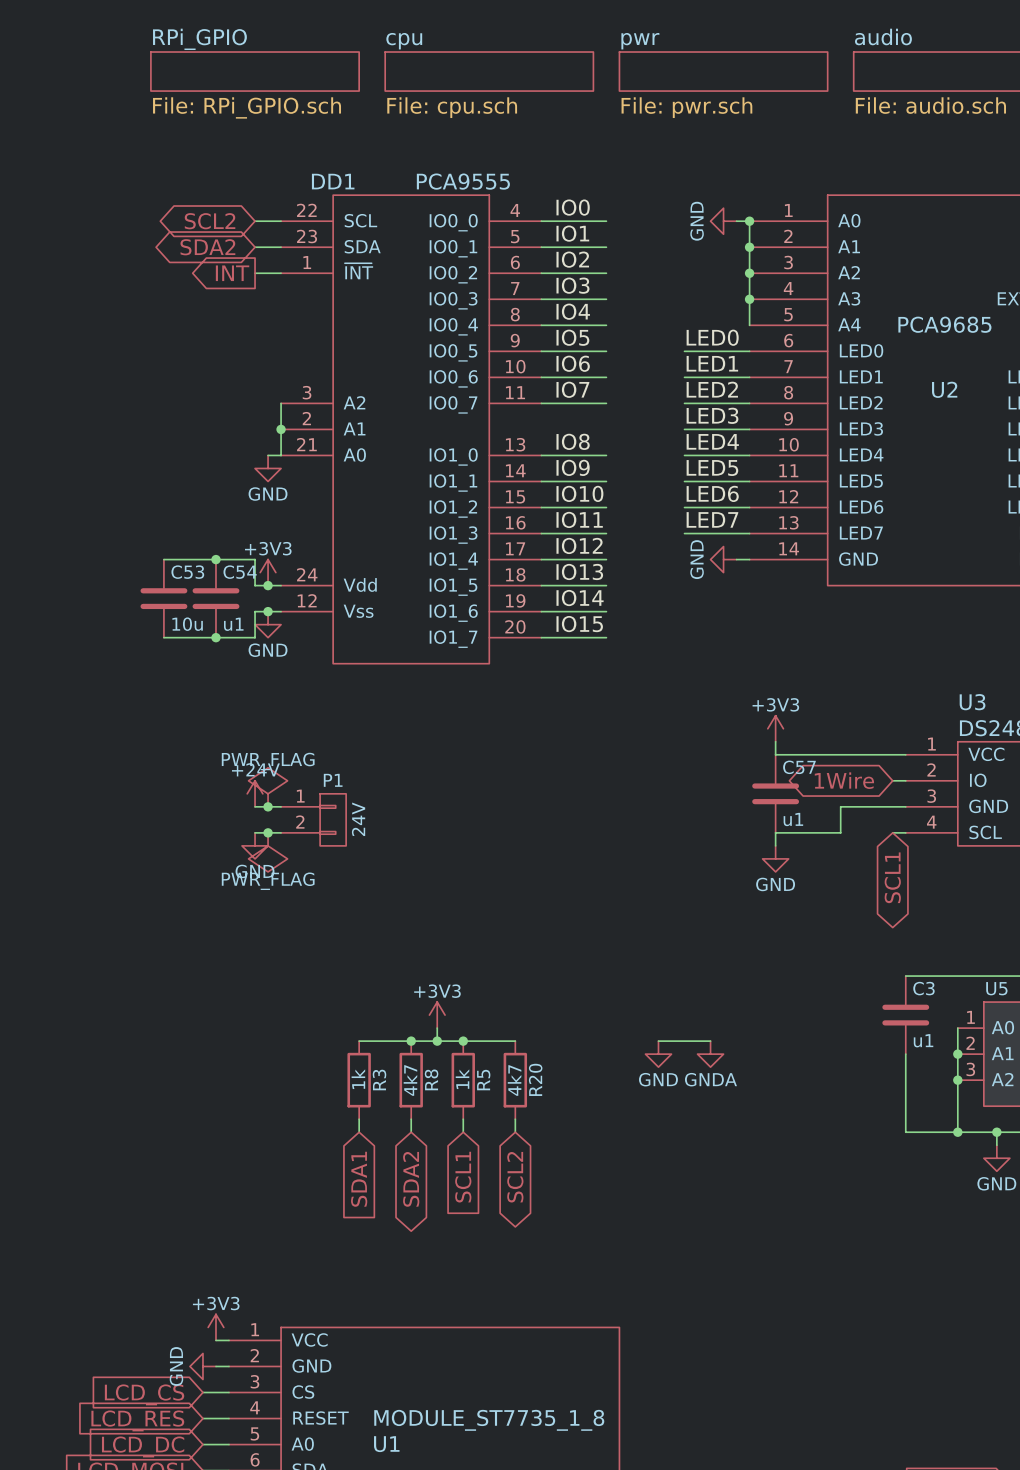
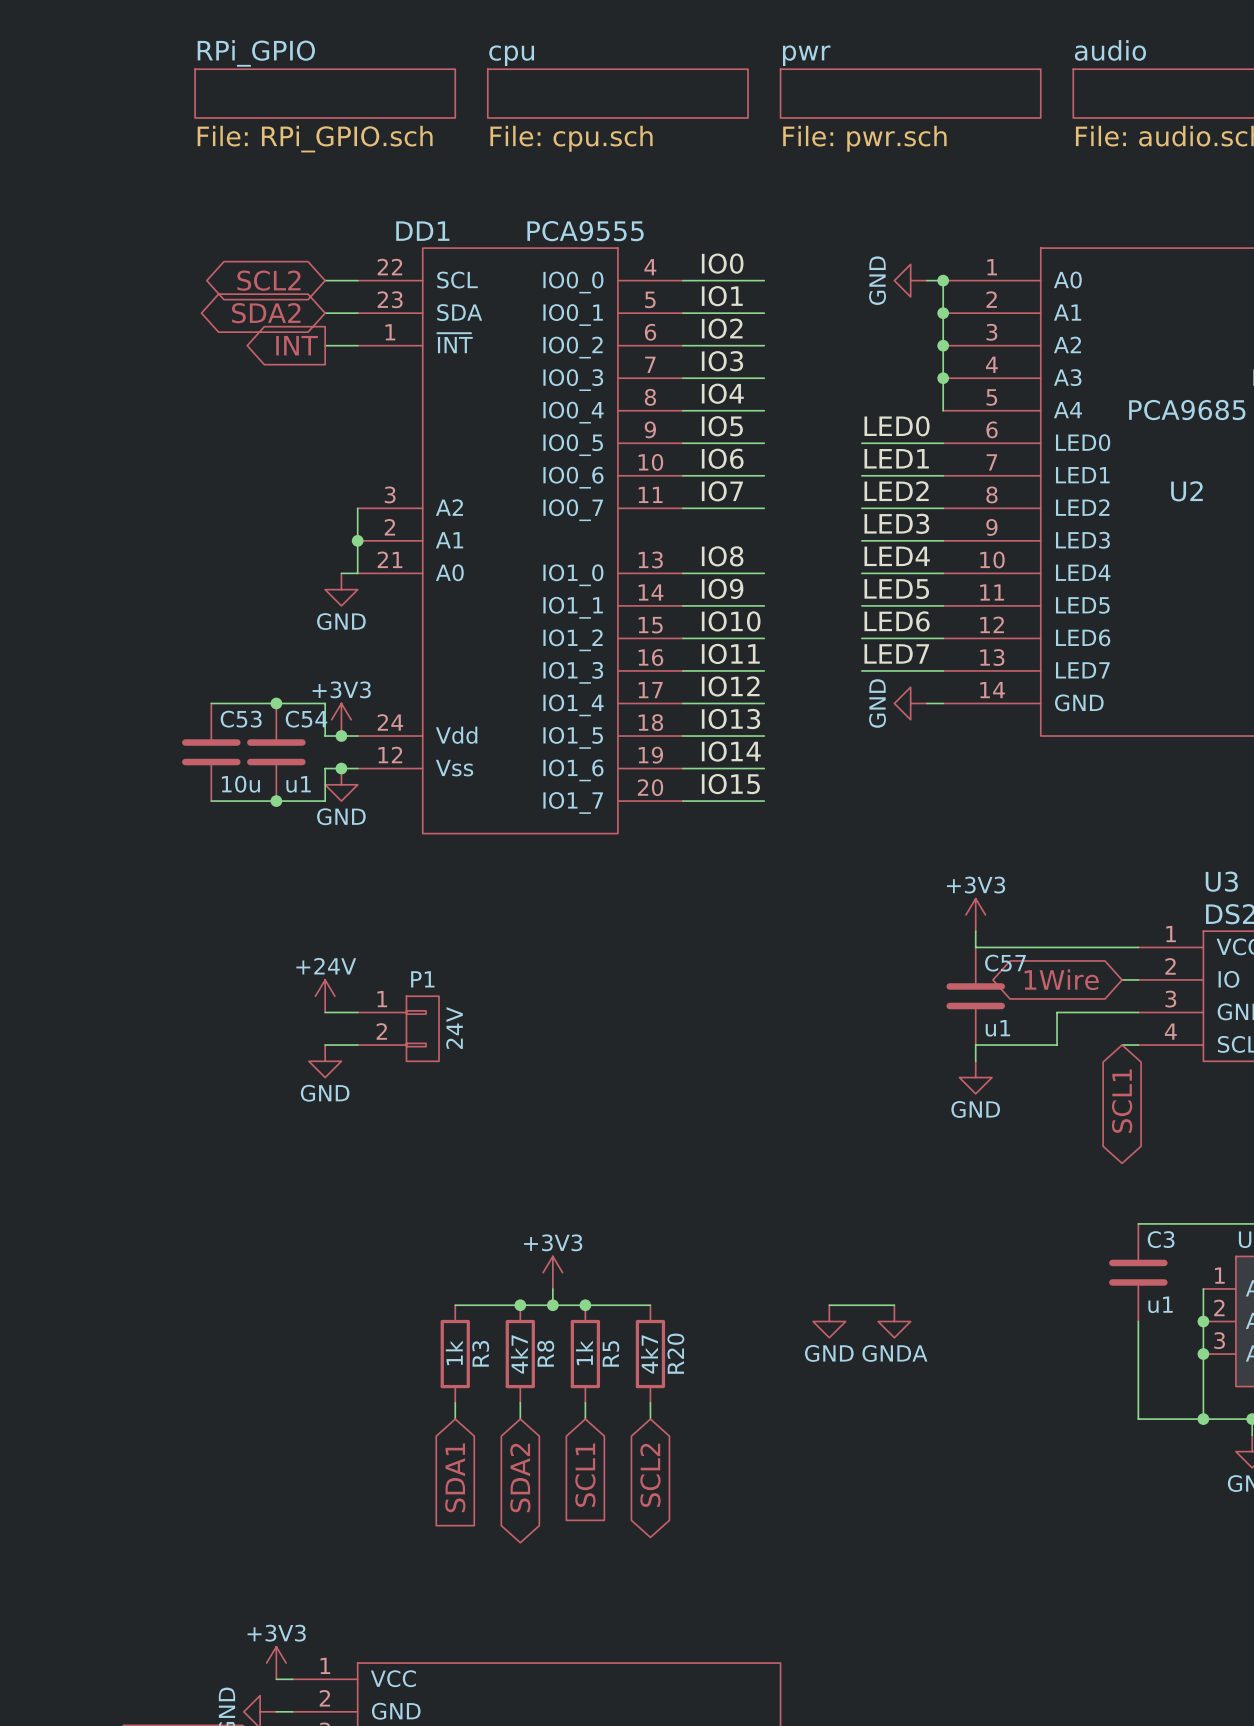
power symbol: PWR_FLAG (268, 787) -> none
junction: (268, 806) -> none
junction: (268, 832) -> none
power symbol: PWR_FLAG (268, 852) -> none

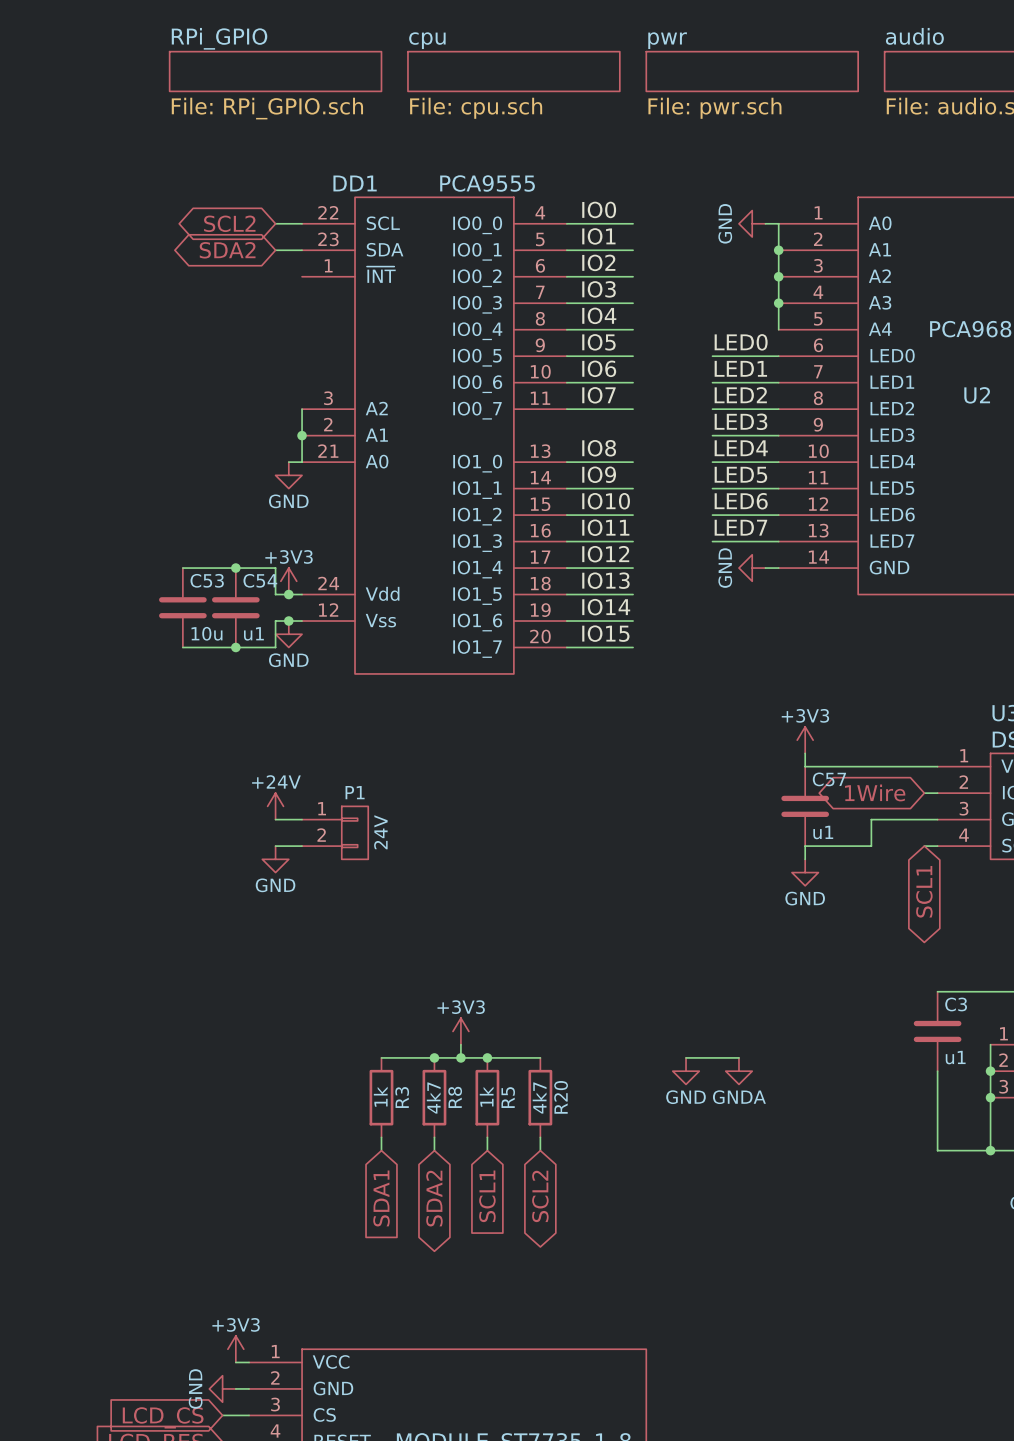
junction: (943, 280) -> none
global label: INT (297, 345) -> none
wire: (325, 345) (357, 345) -> none

